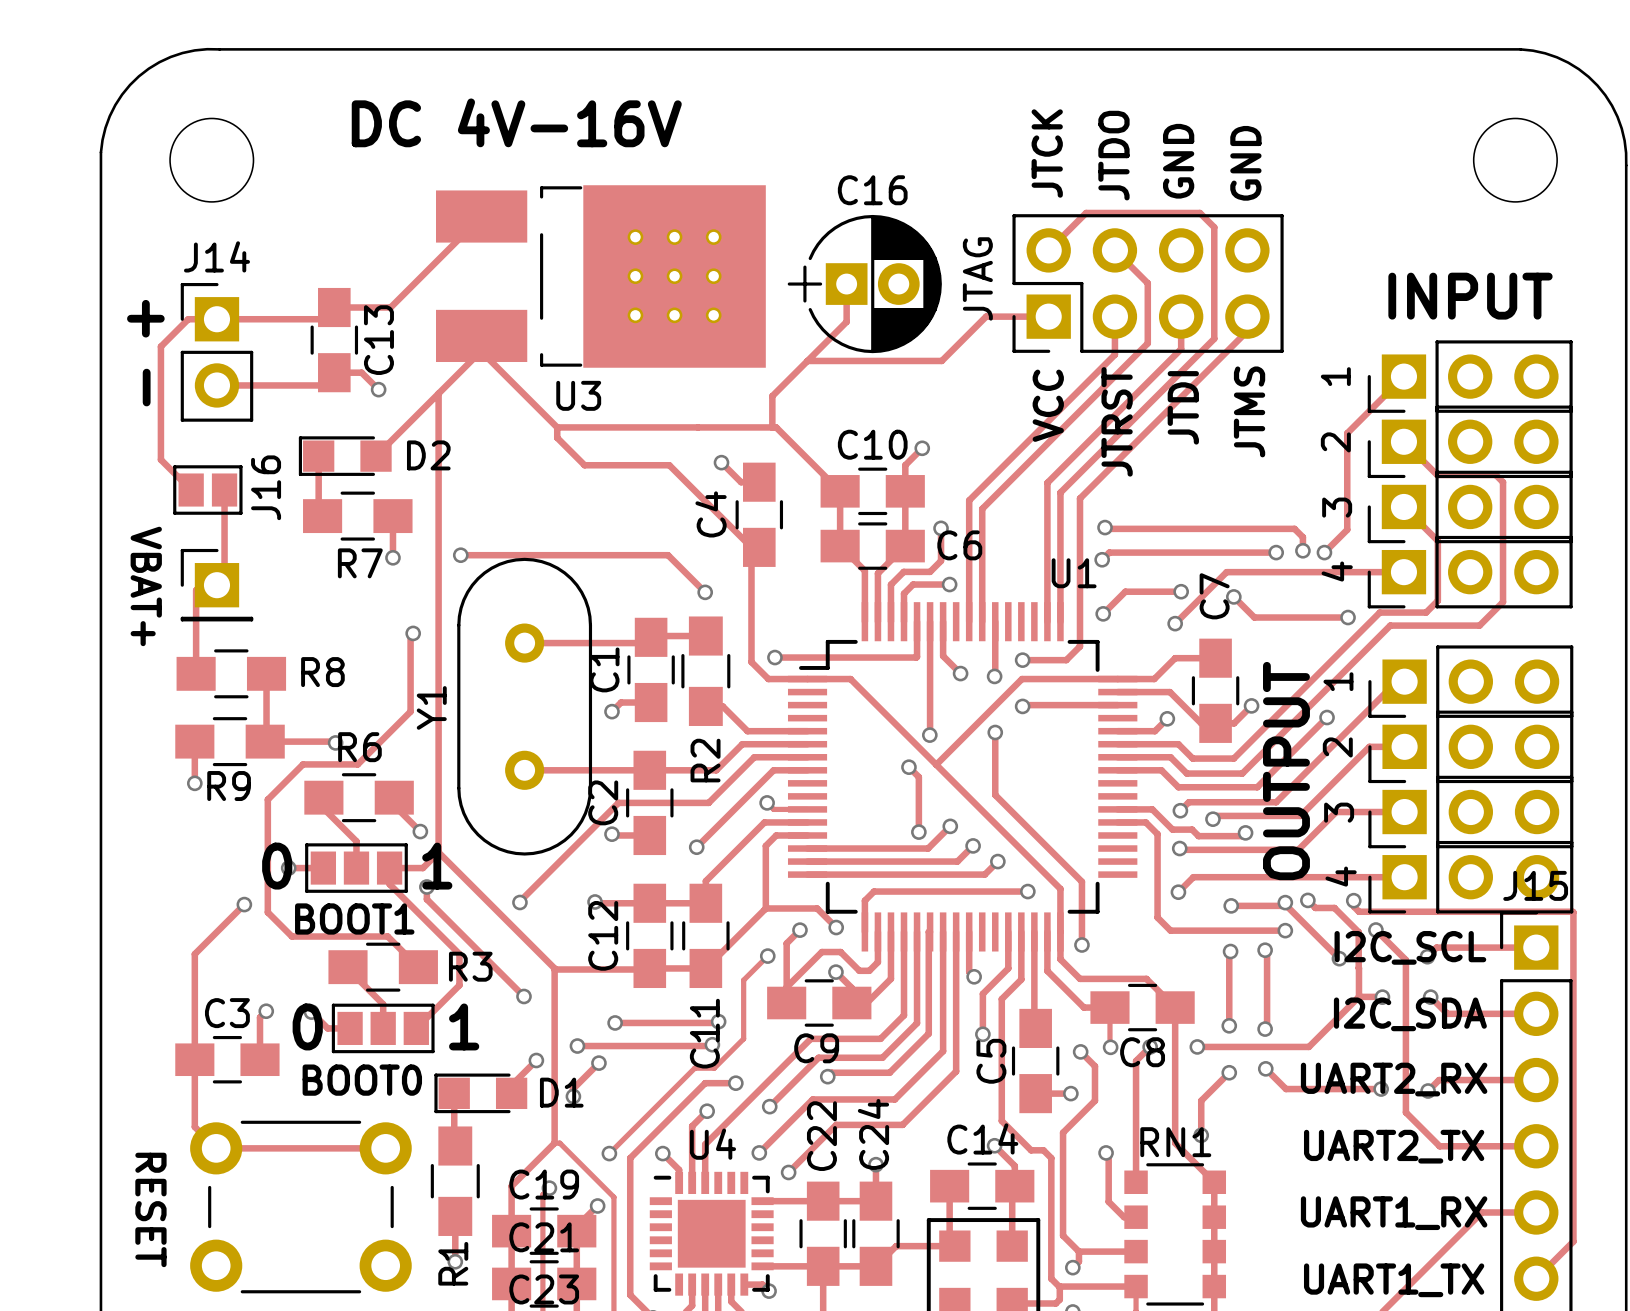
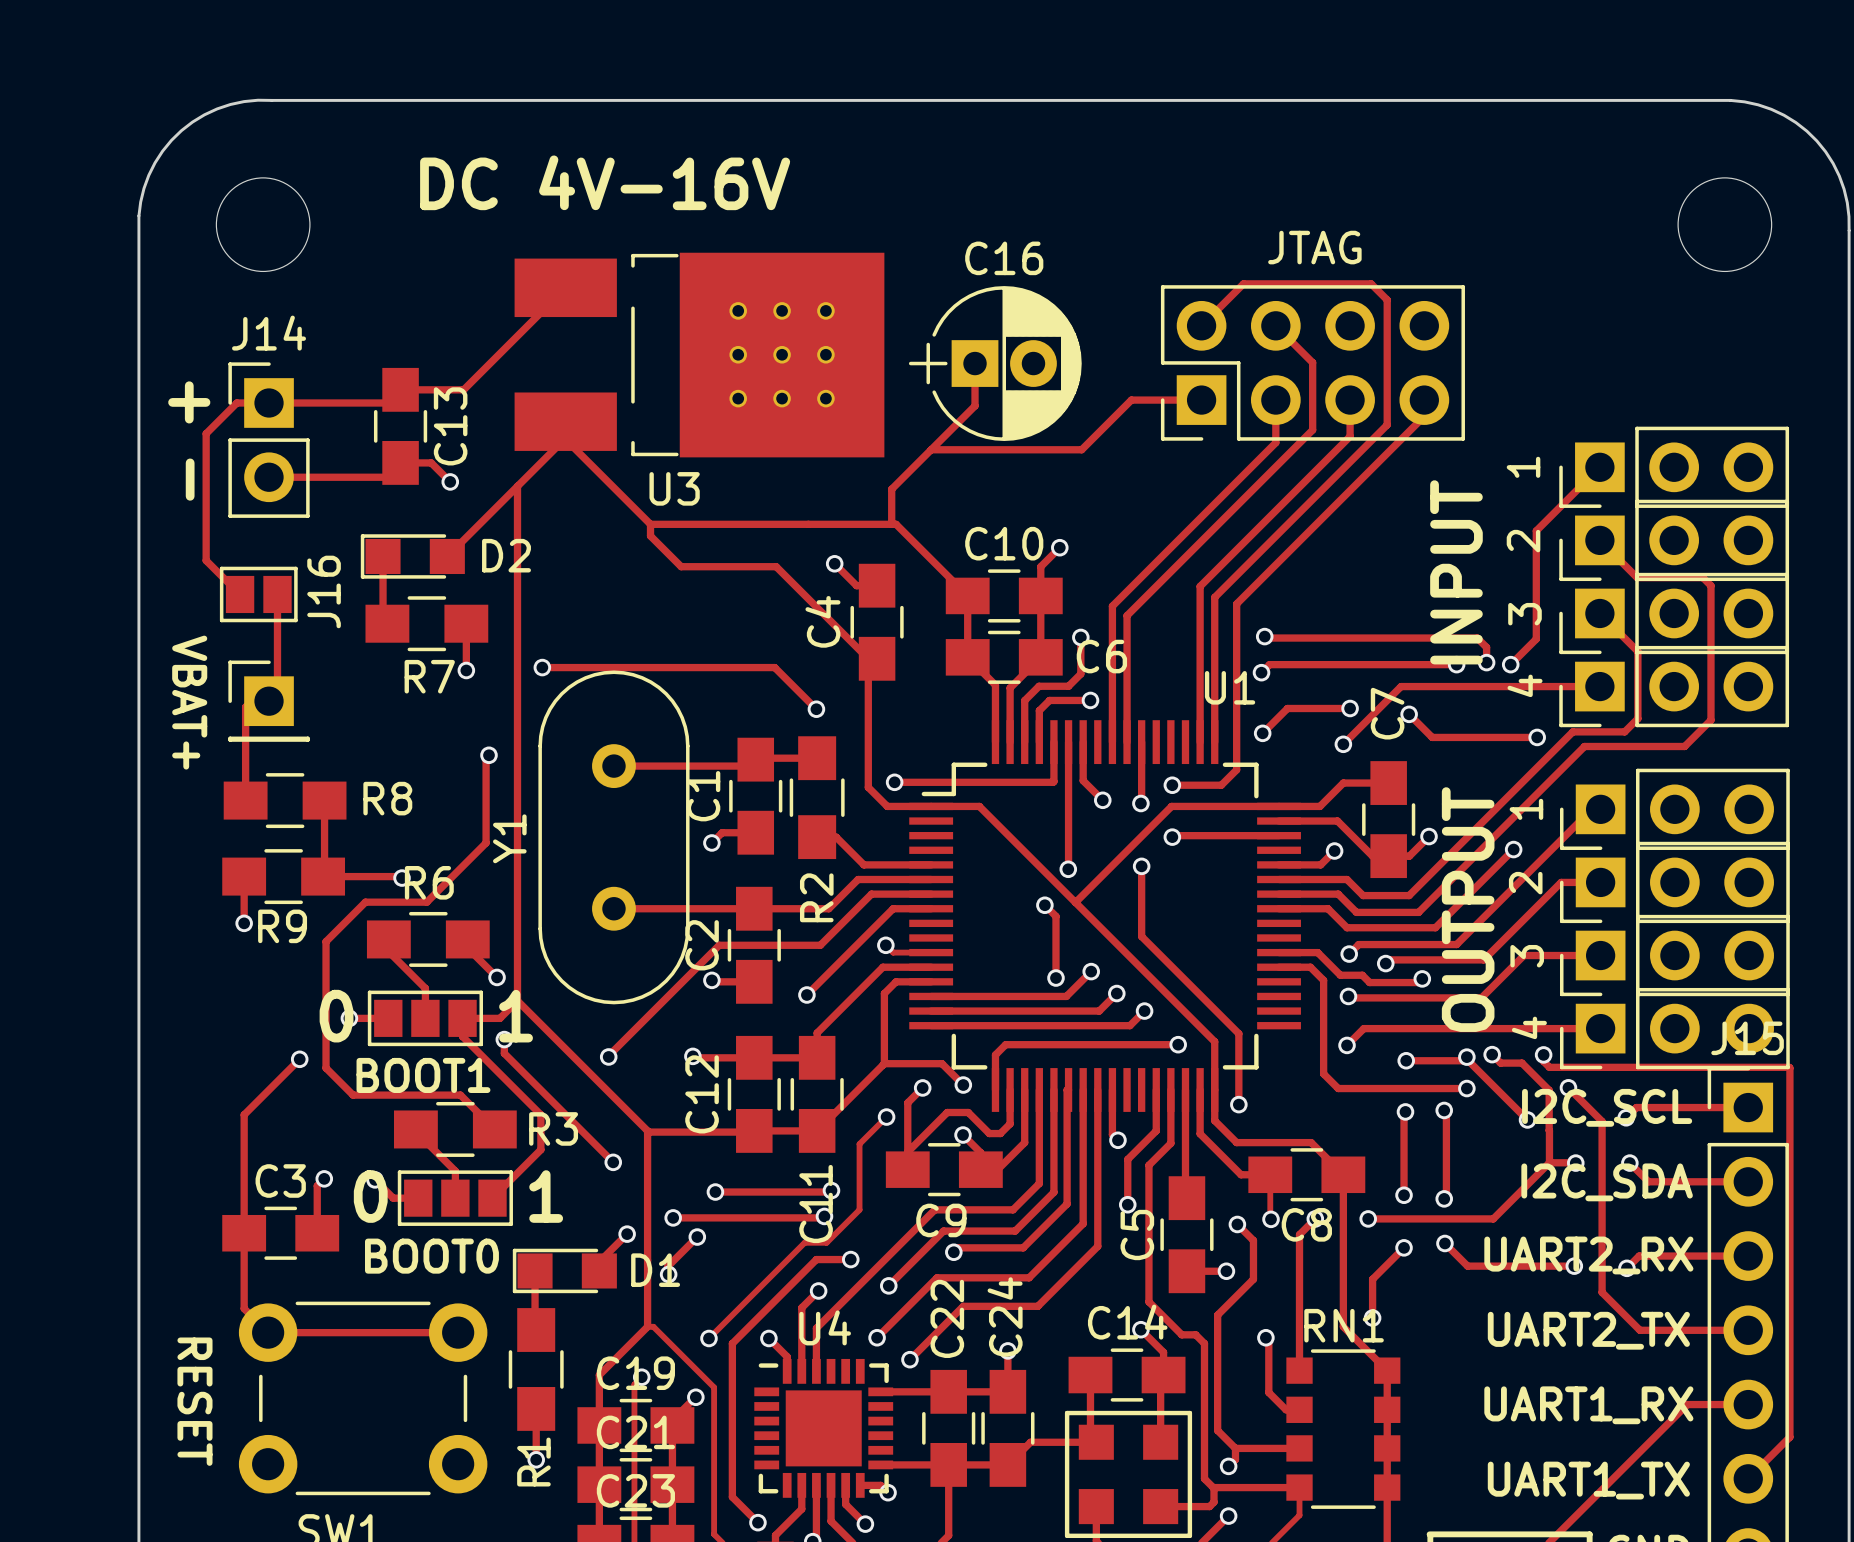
text: JTCK (1047, 153) -> none
text: JTDO (1113, 155) -> none
text: GND (1178, 161) -> none
text: GND (1245, 163) -> none
JTAG name rotation: 0° (977, 278) -> 90° clockwise (1314, 247)
JTAG name position: JTAG (977, 278) -> JTAG (1314, 247)
text rotation: 0° (1470, 296) -> 90° counterclockwise (1456, 572)
text position: INPUT (1470, 296) -> INPUT (1456, 572)
text: VCC (1048, 405) -> none
text: JTDI (1183, 407) -> none
text: JTMS (1249, 411) -> none
text: JTRST (1117, 421) -> none

